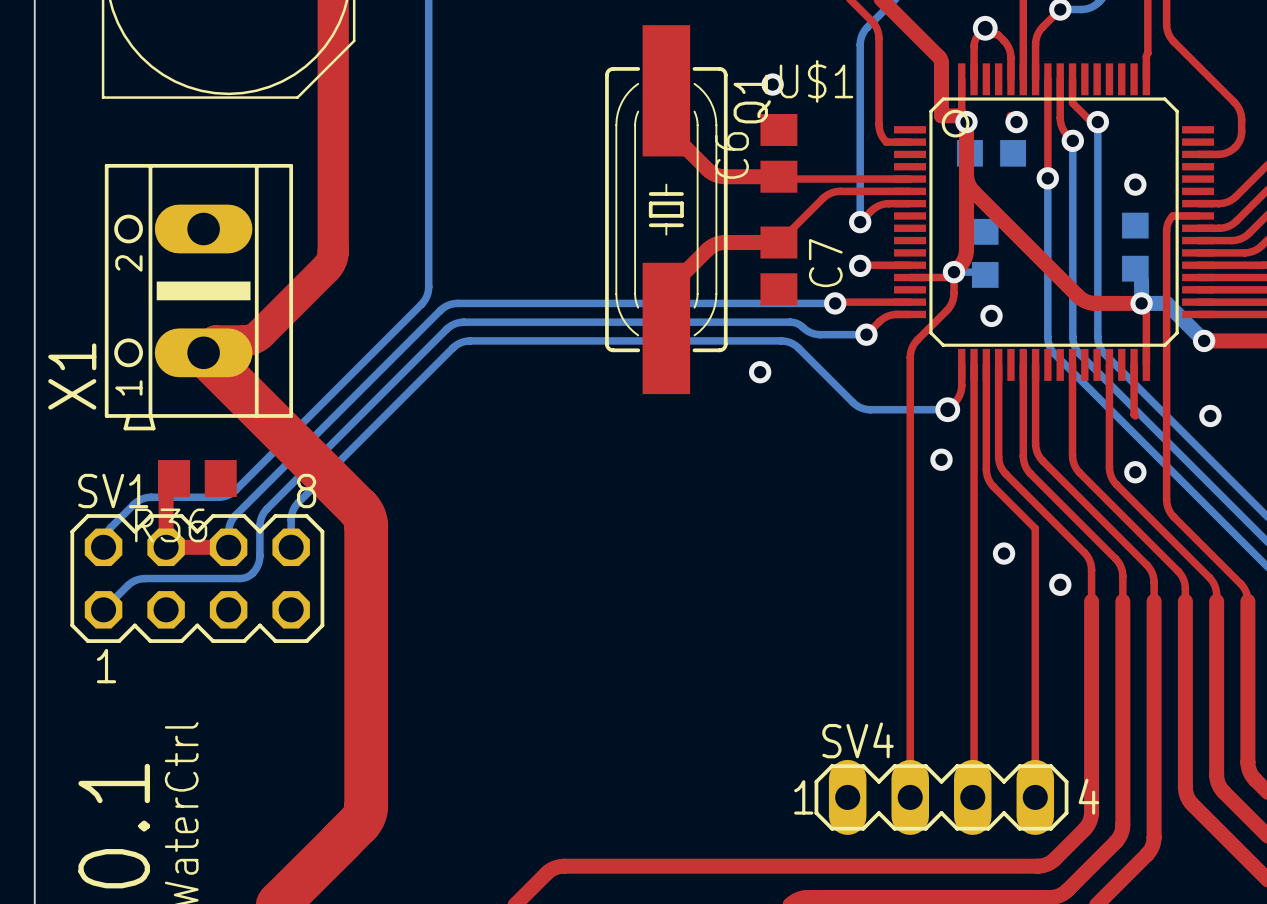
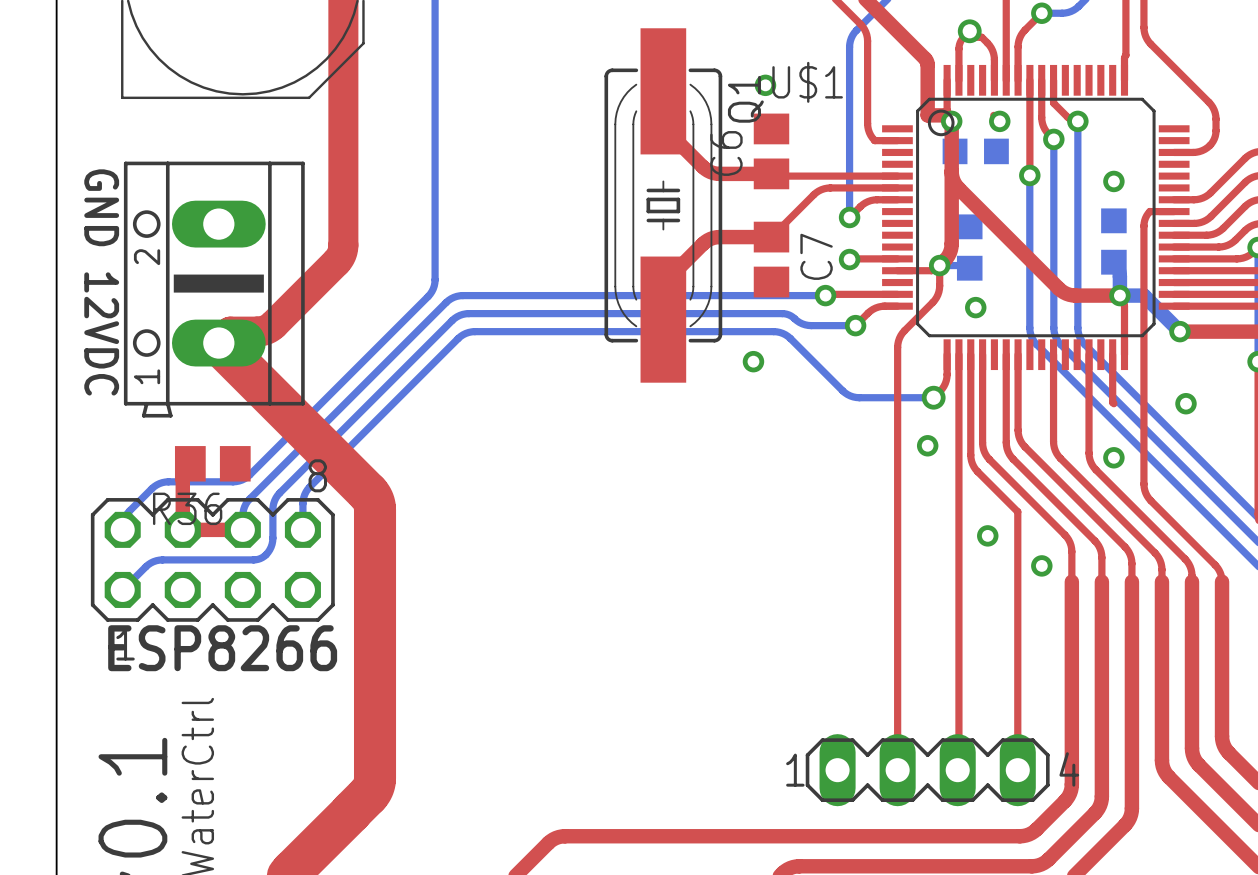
text: none -> GND 12VDC (101, 282)
X1 name: X1 (72, 376) -> none
SV1 name: SV1 (113, 491) -> none
text: none -> ESP8266 (222, 648)
SV4 name: SV4 (858, 740) -> none

